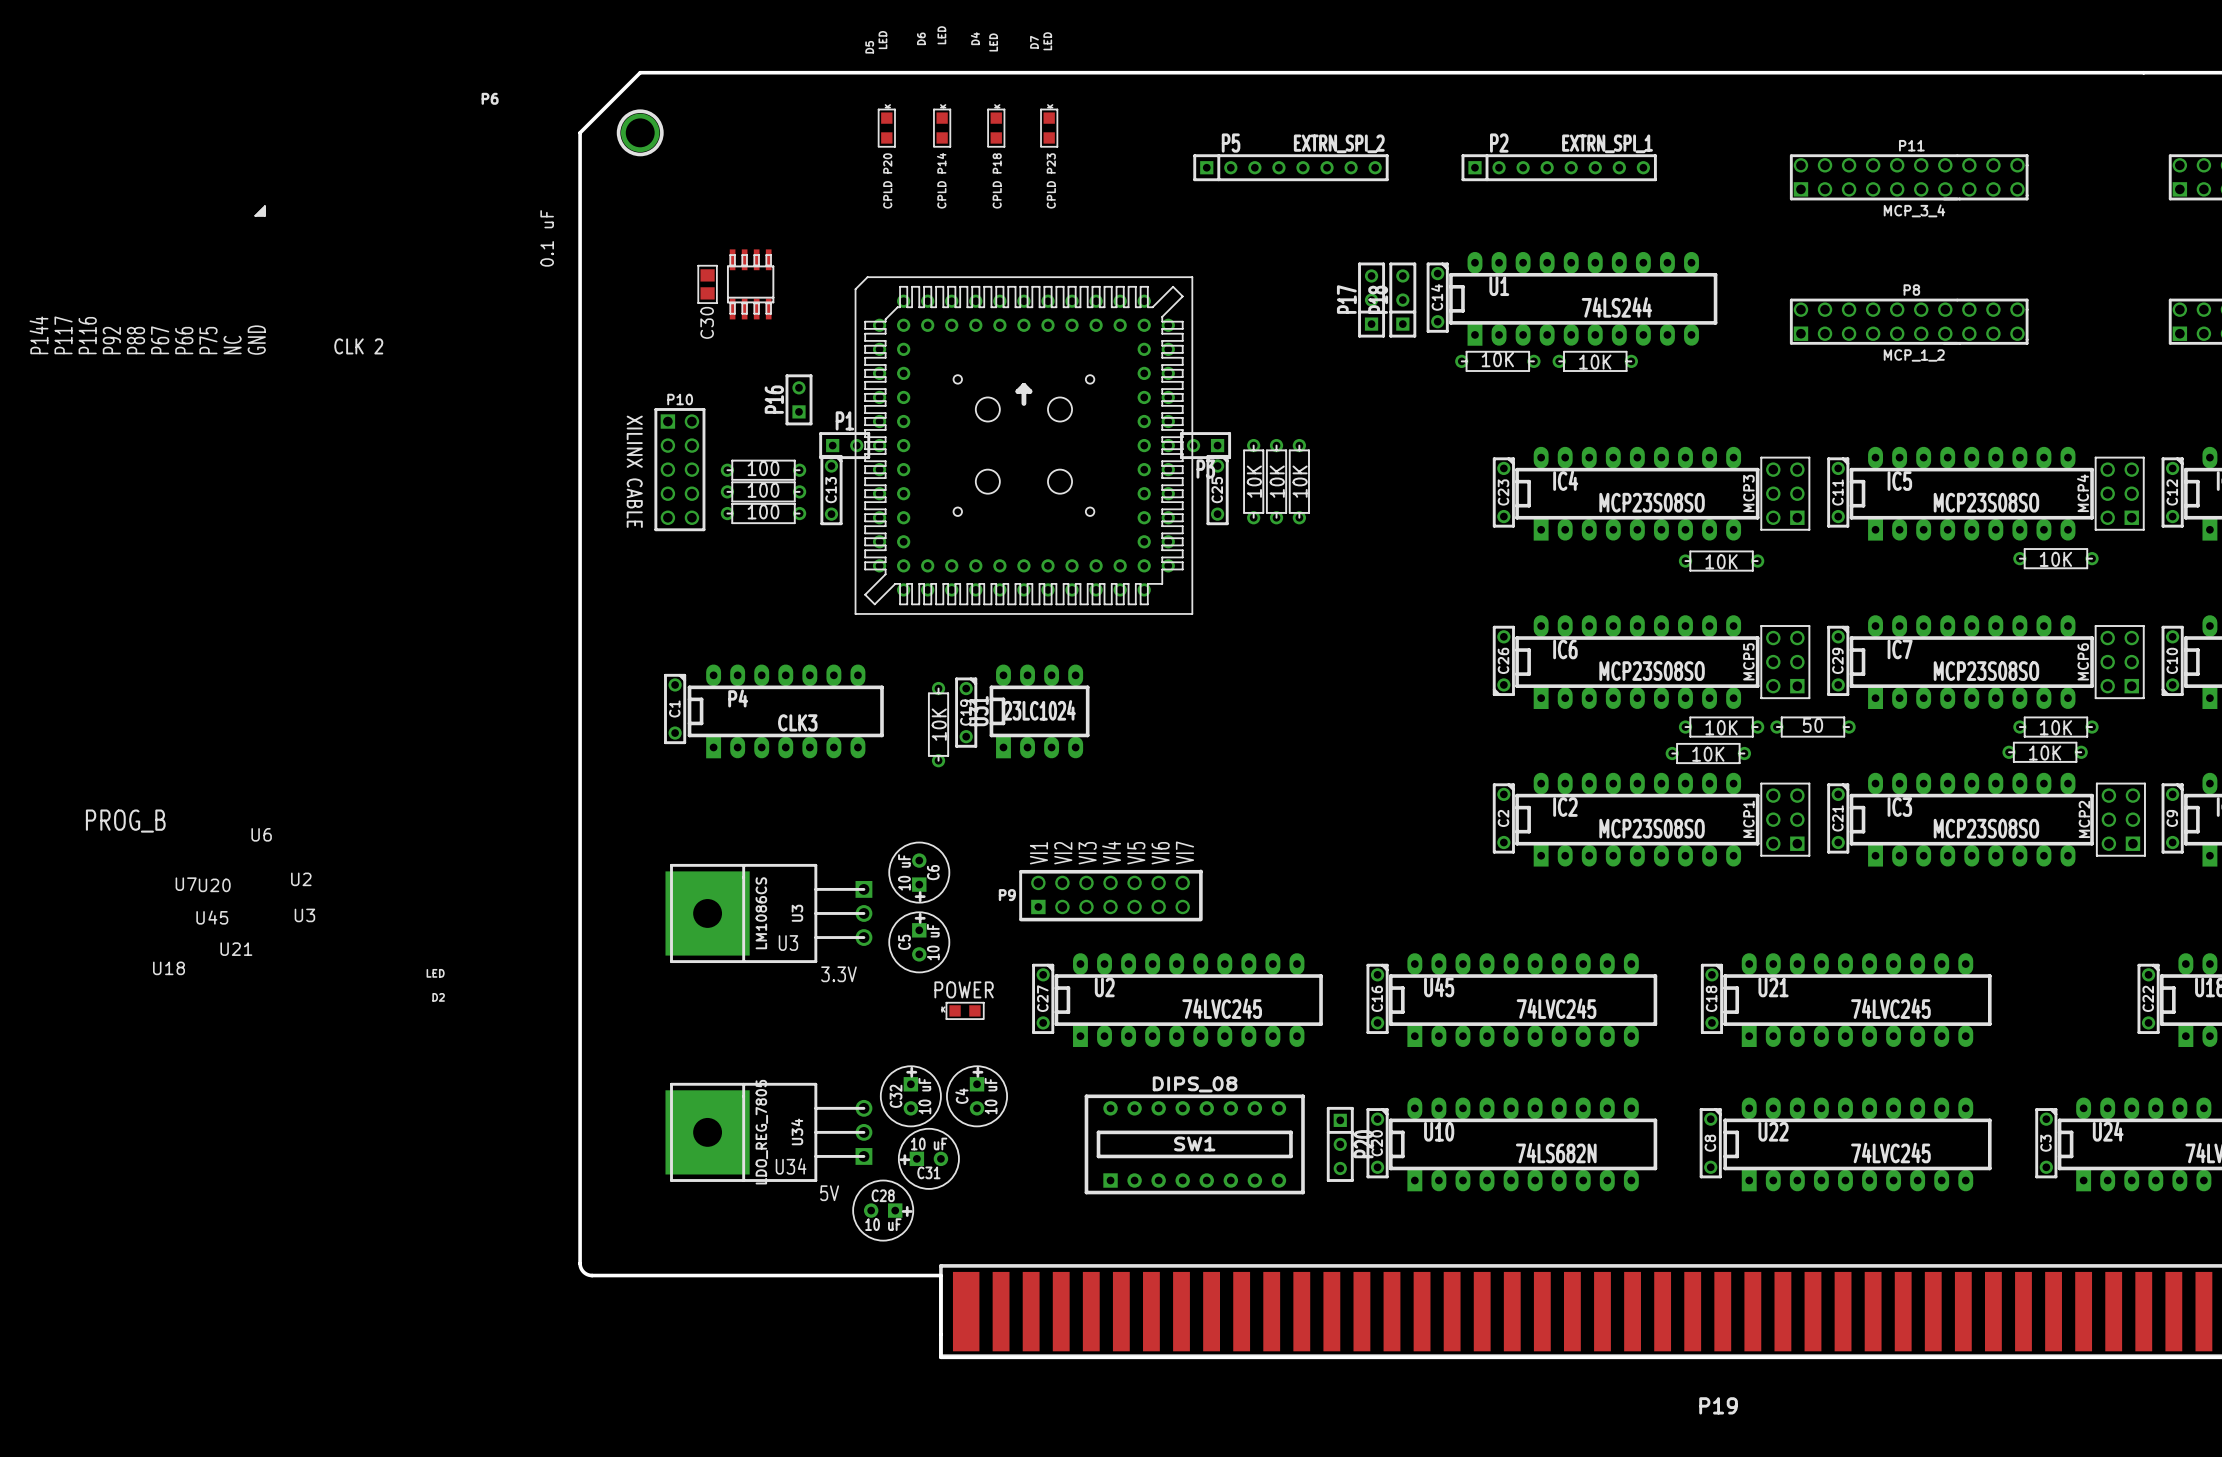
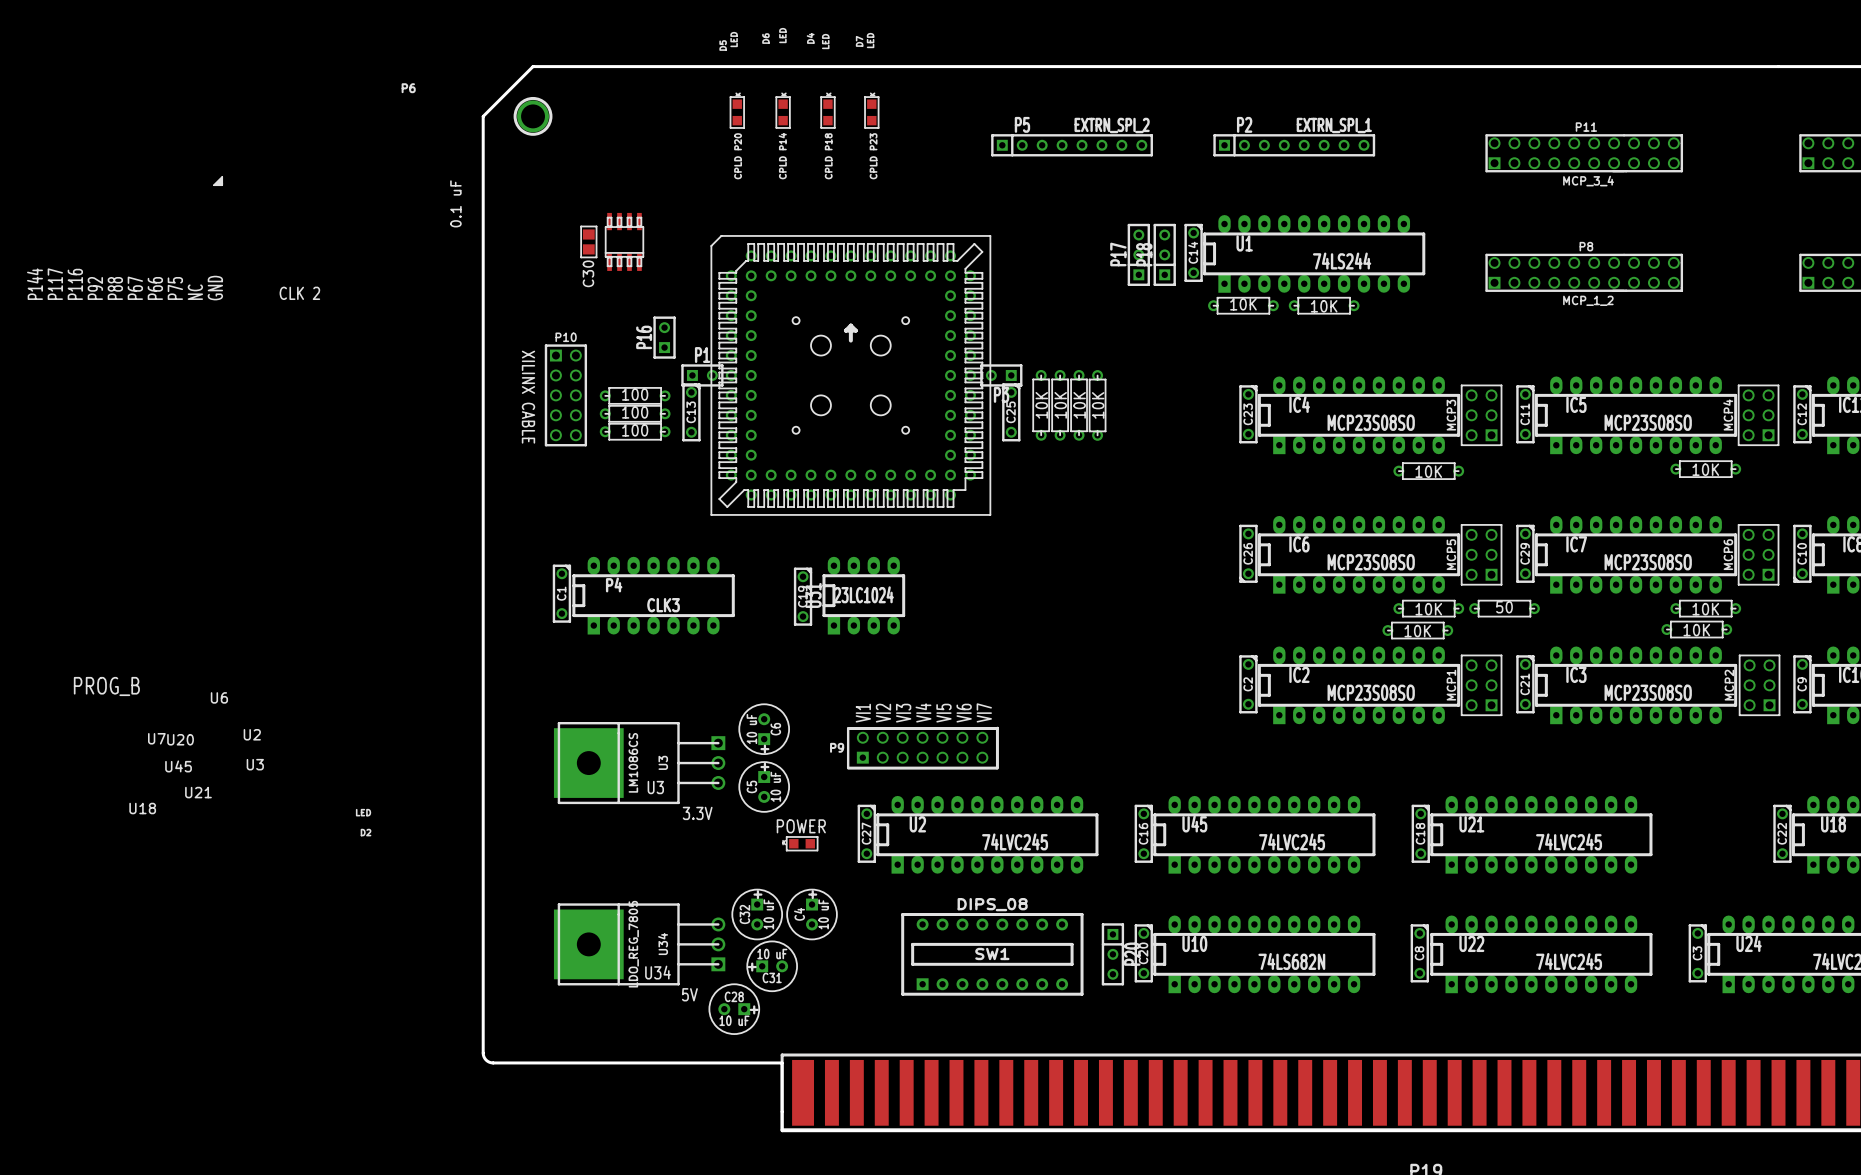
part: none -> 10K (1097, 405)
part: 10K (938, 724) -> none

